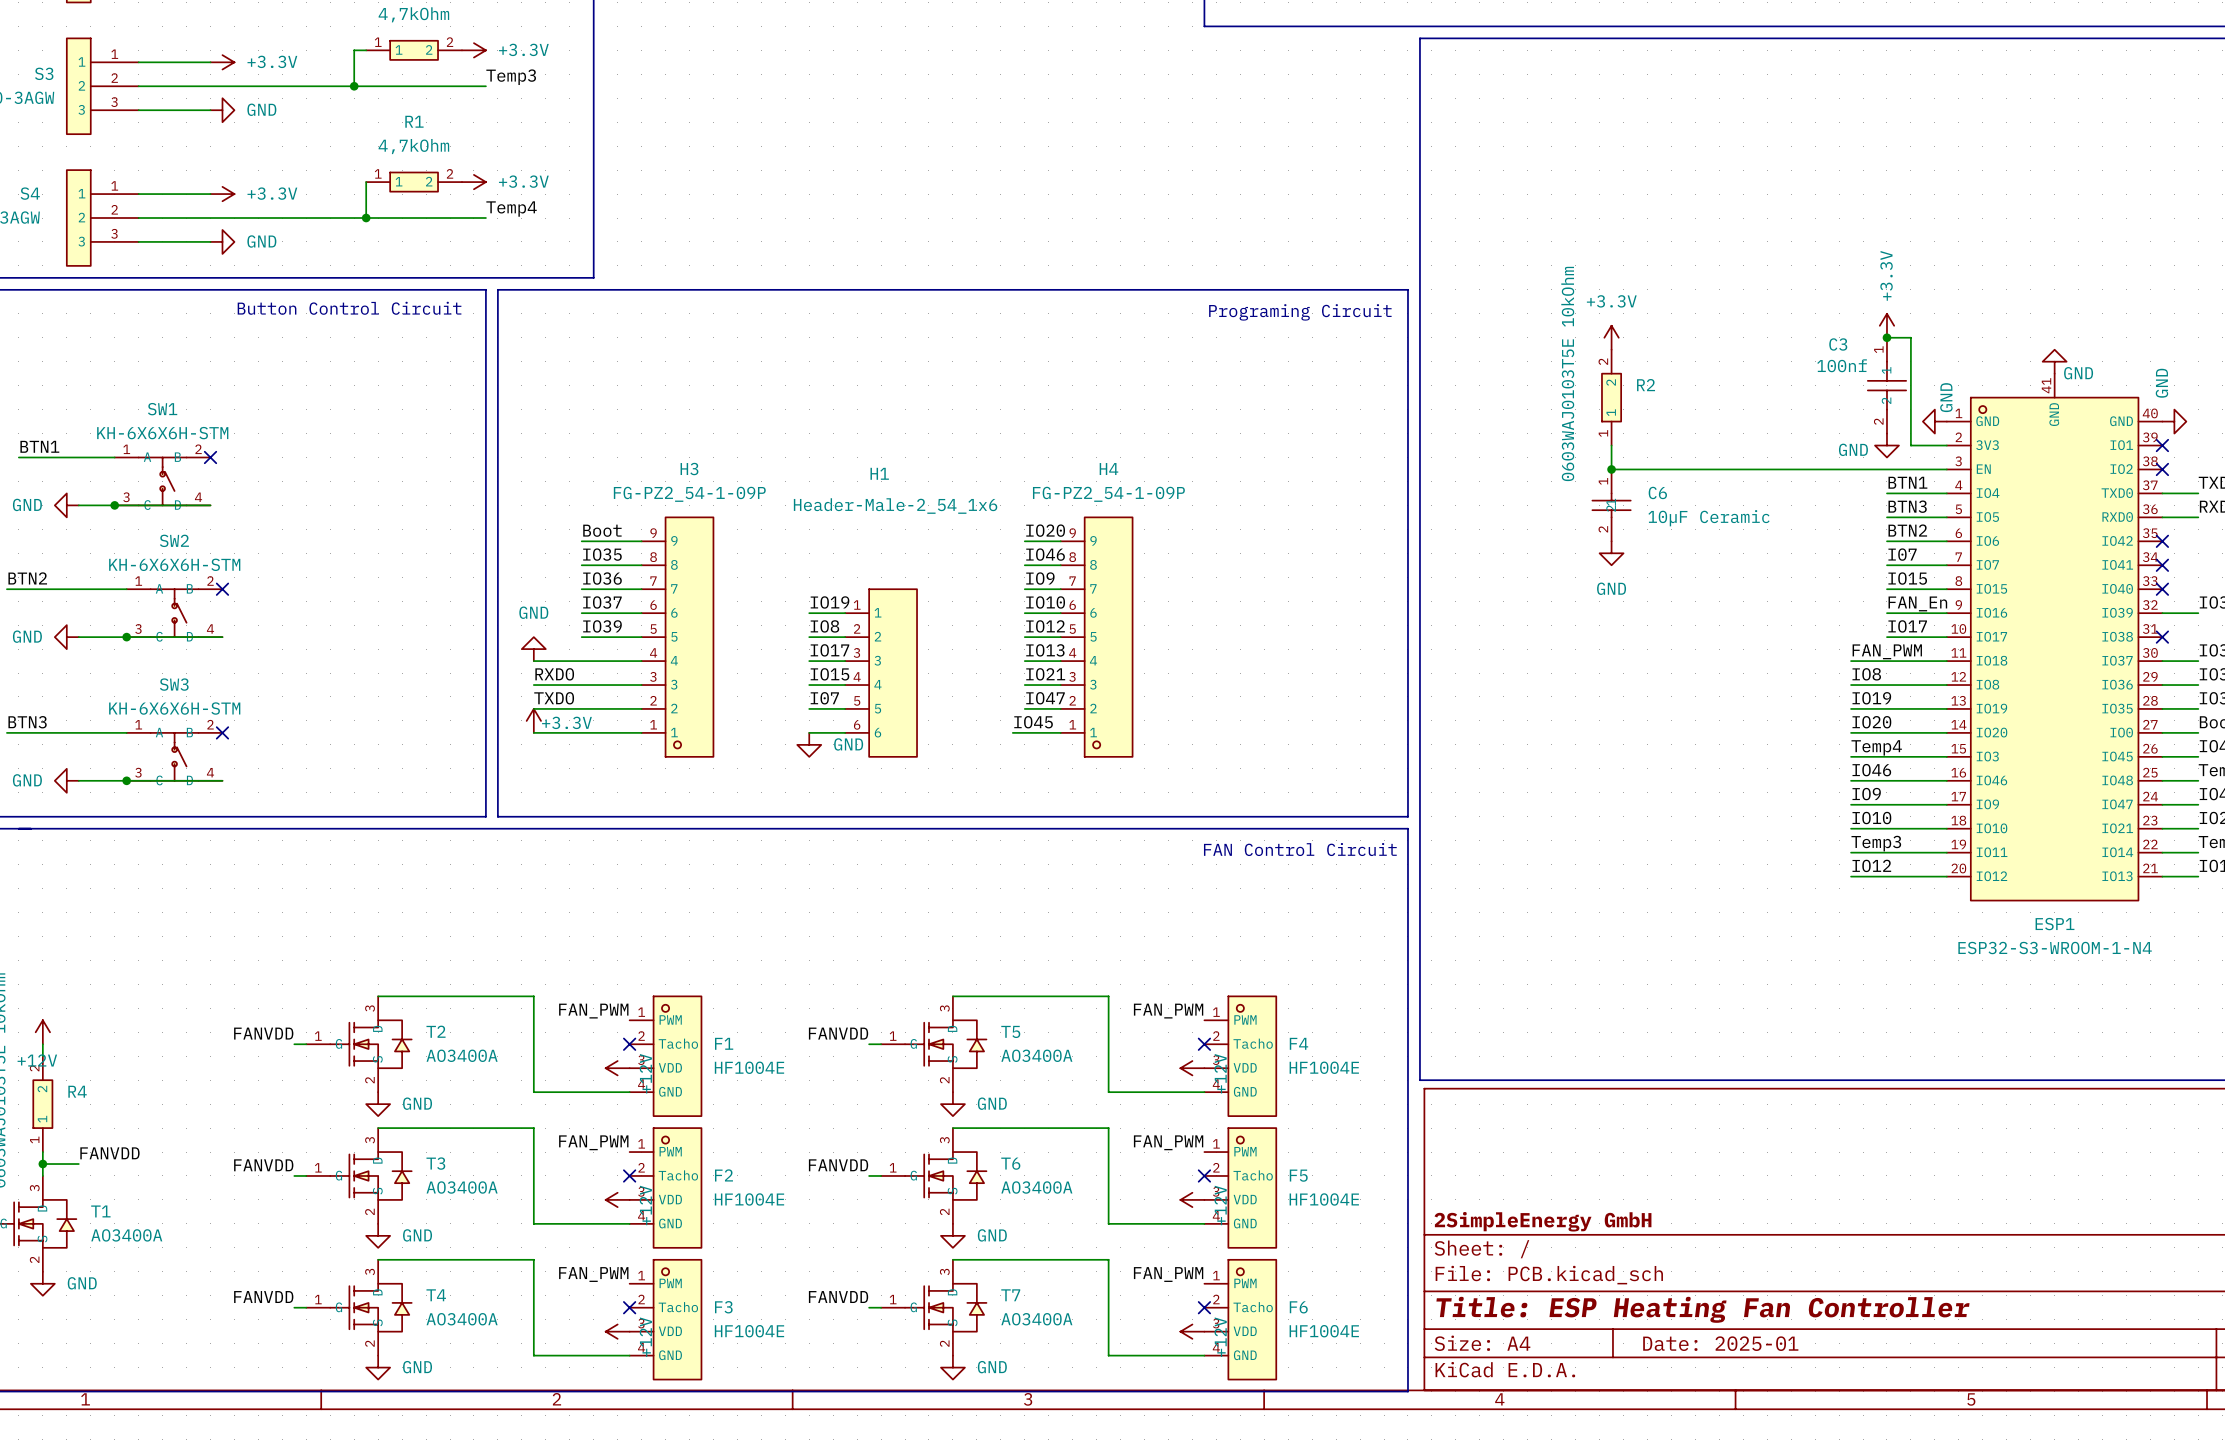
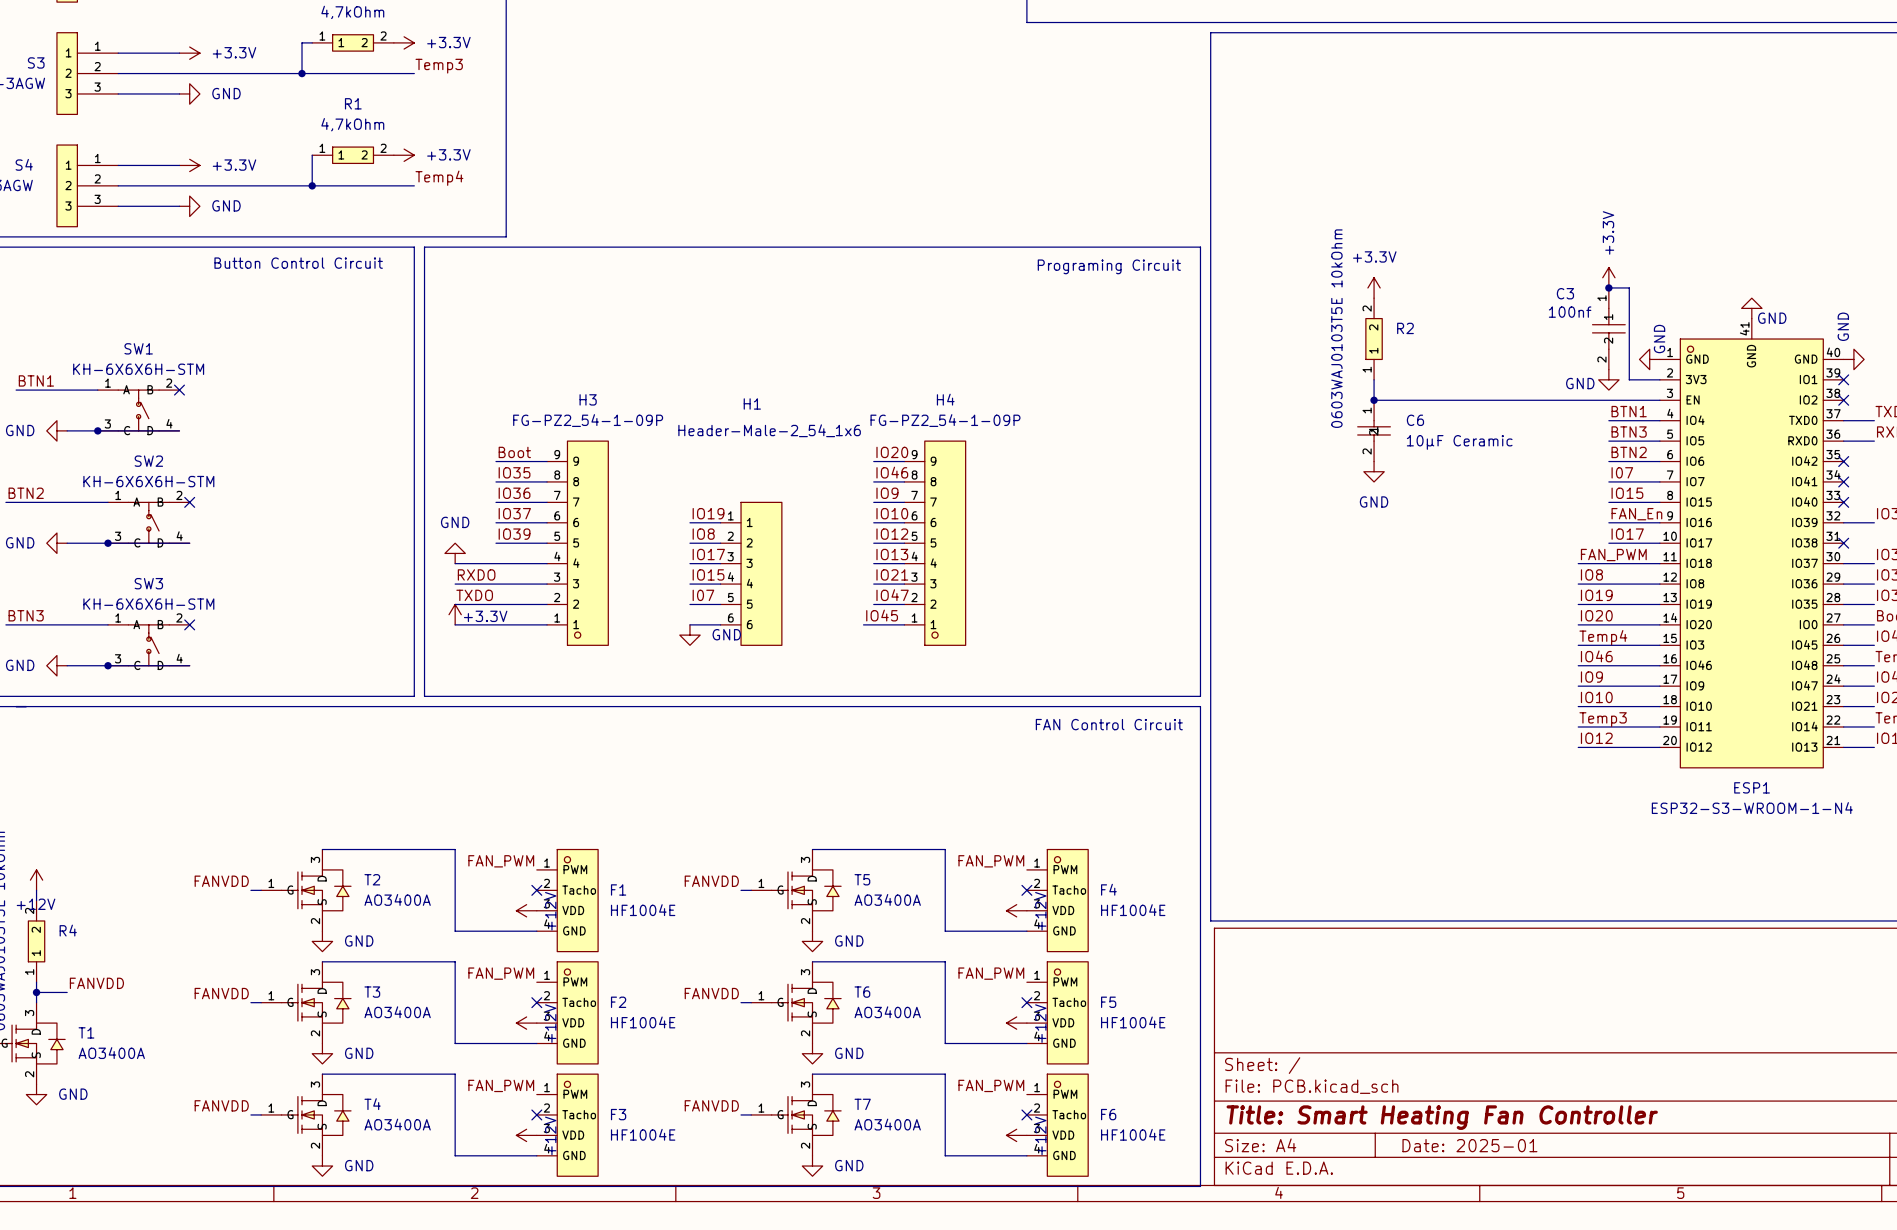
title block: 2SimpleEnergy GmbH (1543, 1221) -> none
title block: Title: ESP Heating Fan Controller (1702, 1309) -> Title: Smart Heating Fan Controller (1442, 1117)

